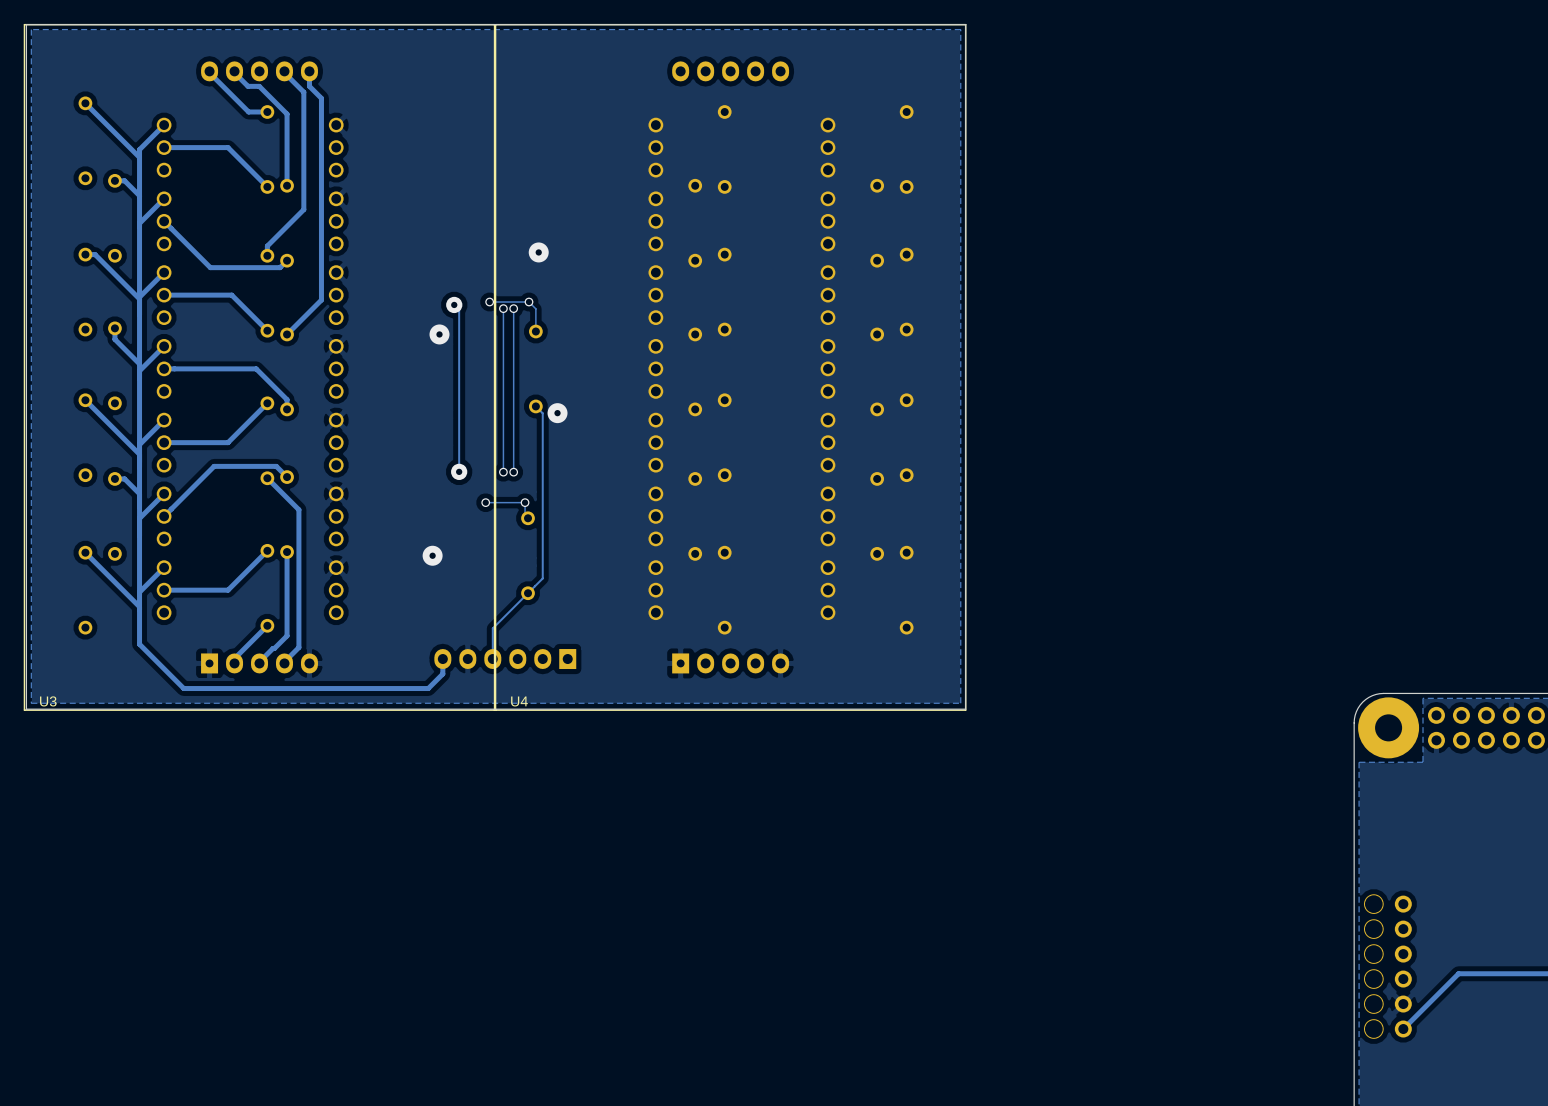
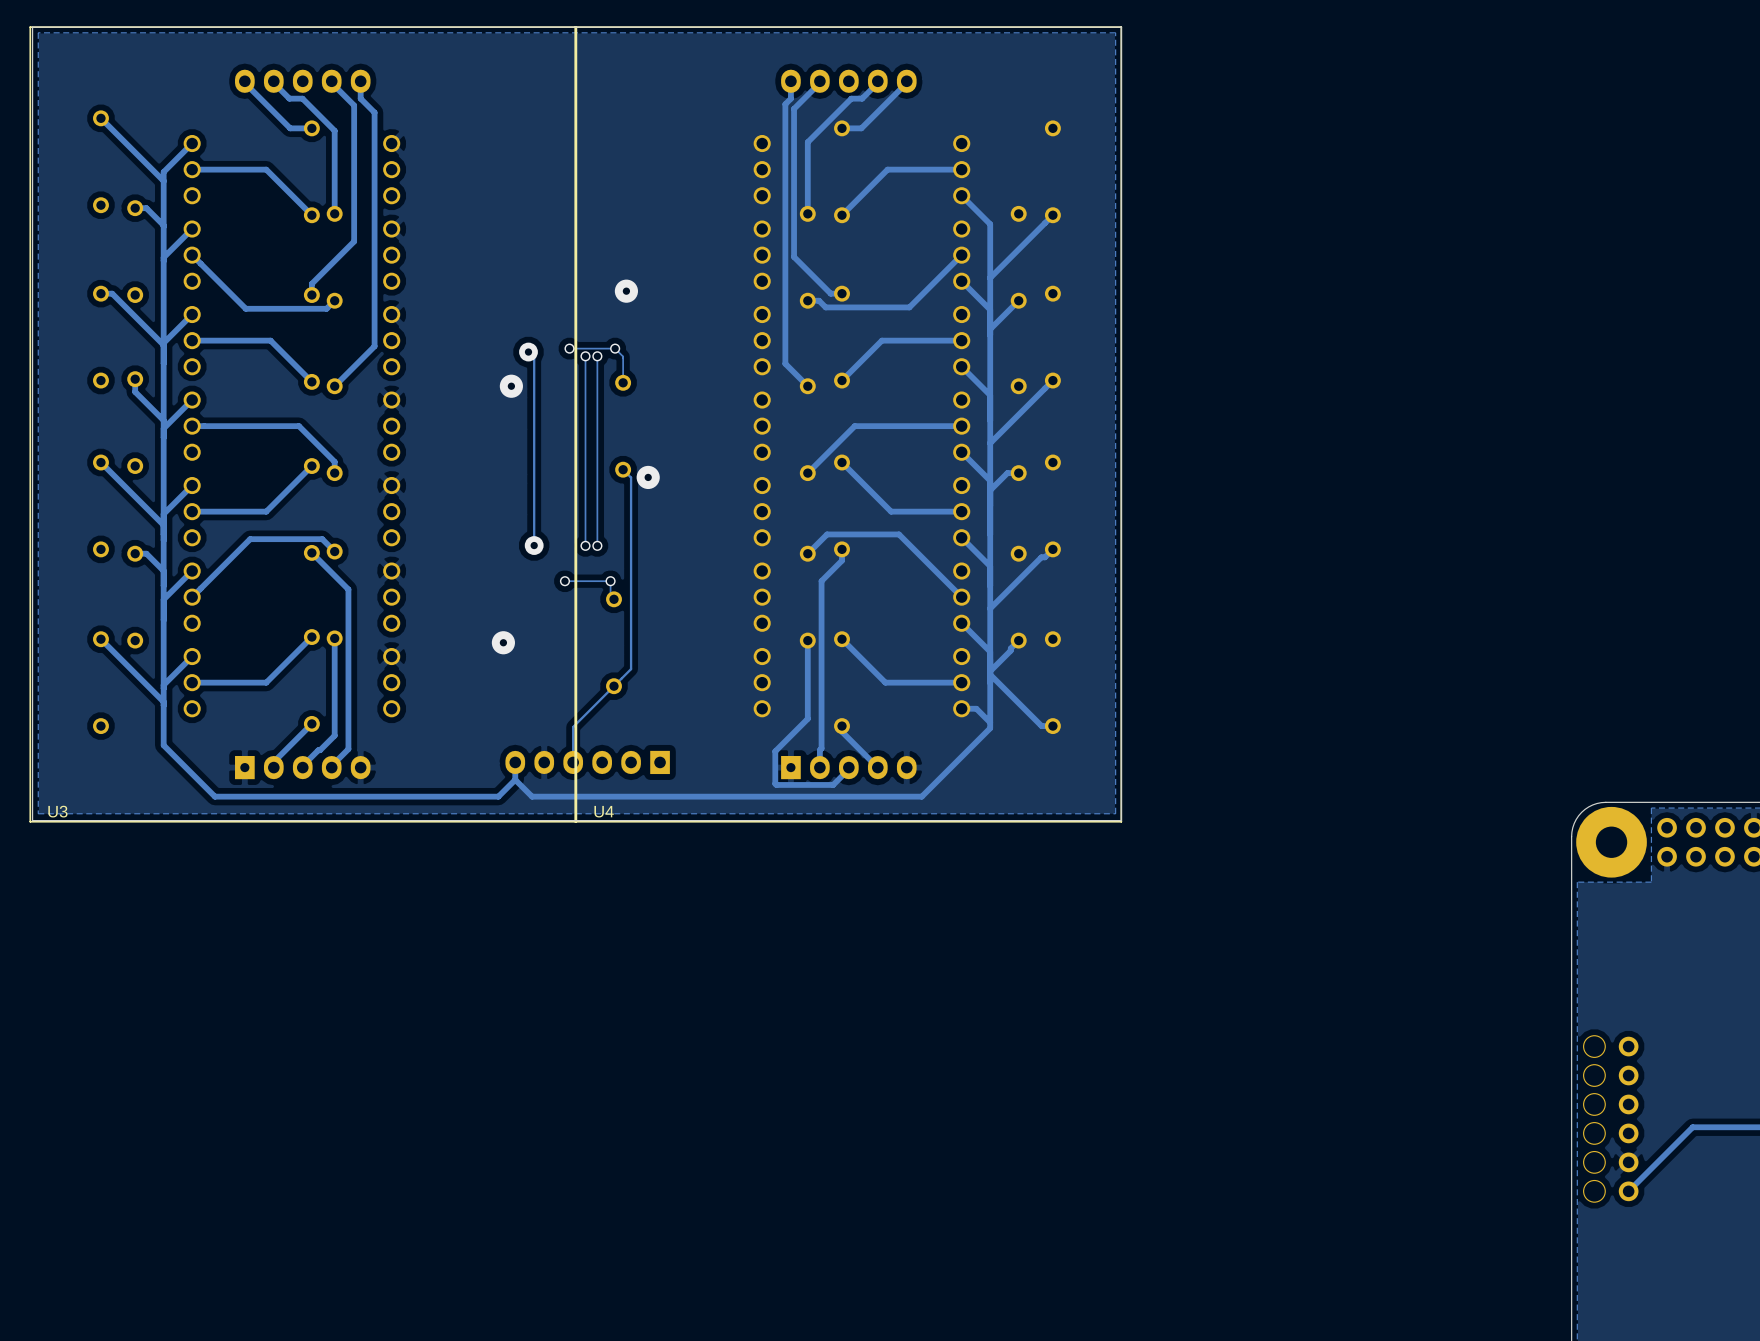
track: none -> (790, 81) (790, 98) (785, 104) (785, 363) (807, 386)
track: none -> (819, 81) (794, 108) (794, 256) (830, 293) (842, 293)
track: none -> (877, 81) (862, 98) (851, 98) (807, 142) (807, 213)
track: none -> (906, 81) (861, 128) (842, 128)
track: none -> (961, 169) (887, 169) (842, 215)
track: none -> (961, 195) (990, 224) (990, 728) (921, 796) (532, 796) (515, 779)
track: none -> (1052, 215) (990, 277)
track: none -> (961, 255) (909, 307) (825, 307) (819, 300) (807, 300)
track: none -> (961, 281) (990, 309)
track: none -> (1018, 300) (990, 329)
track: none -> (961, 340) (881, 340) (842, 380)
track: none -> (961, 366) (990, 395)
track: none -> (1052, 380) (990, 443)
track: none -> (961, 426) (854, 426) (807, 473)
track: none -> (961, 452) (990, 480)
track: none -> (842, 462) (891, 511) (961, 511)
track: none -> (1018, 473) (1007, 473) (990, 490)
track: none -> (961, 537) (990, 566)
track: none -> (842, 549) (842, 560) (821, 581) (819, 767)
track: none -> (1052, 549) (1044, 557) (1041, 557) (990, 608)
track: none -> (807, 553) (827, 534) (899, 534) (961, 597)
track: none -> (961, 623) (990, 651)
track: none -> (842, 639) (885, 682) (961, 682)
track: none -> (807, 640) (807, 718) (775, 751) (775, 783) (833, 784) (848, 767)
track: none -> (1018, 640) (990, 671)
track: none -> (990, 674) (1041, 726) (1052, 726)
track: none -> (961, 708) (976, 708) (990, 722)
track: none -> (842, 726) (842, 731) (877, 767)

